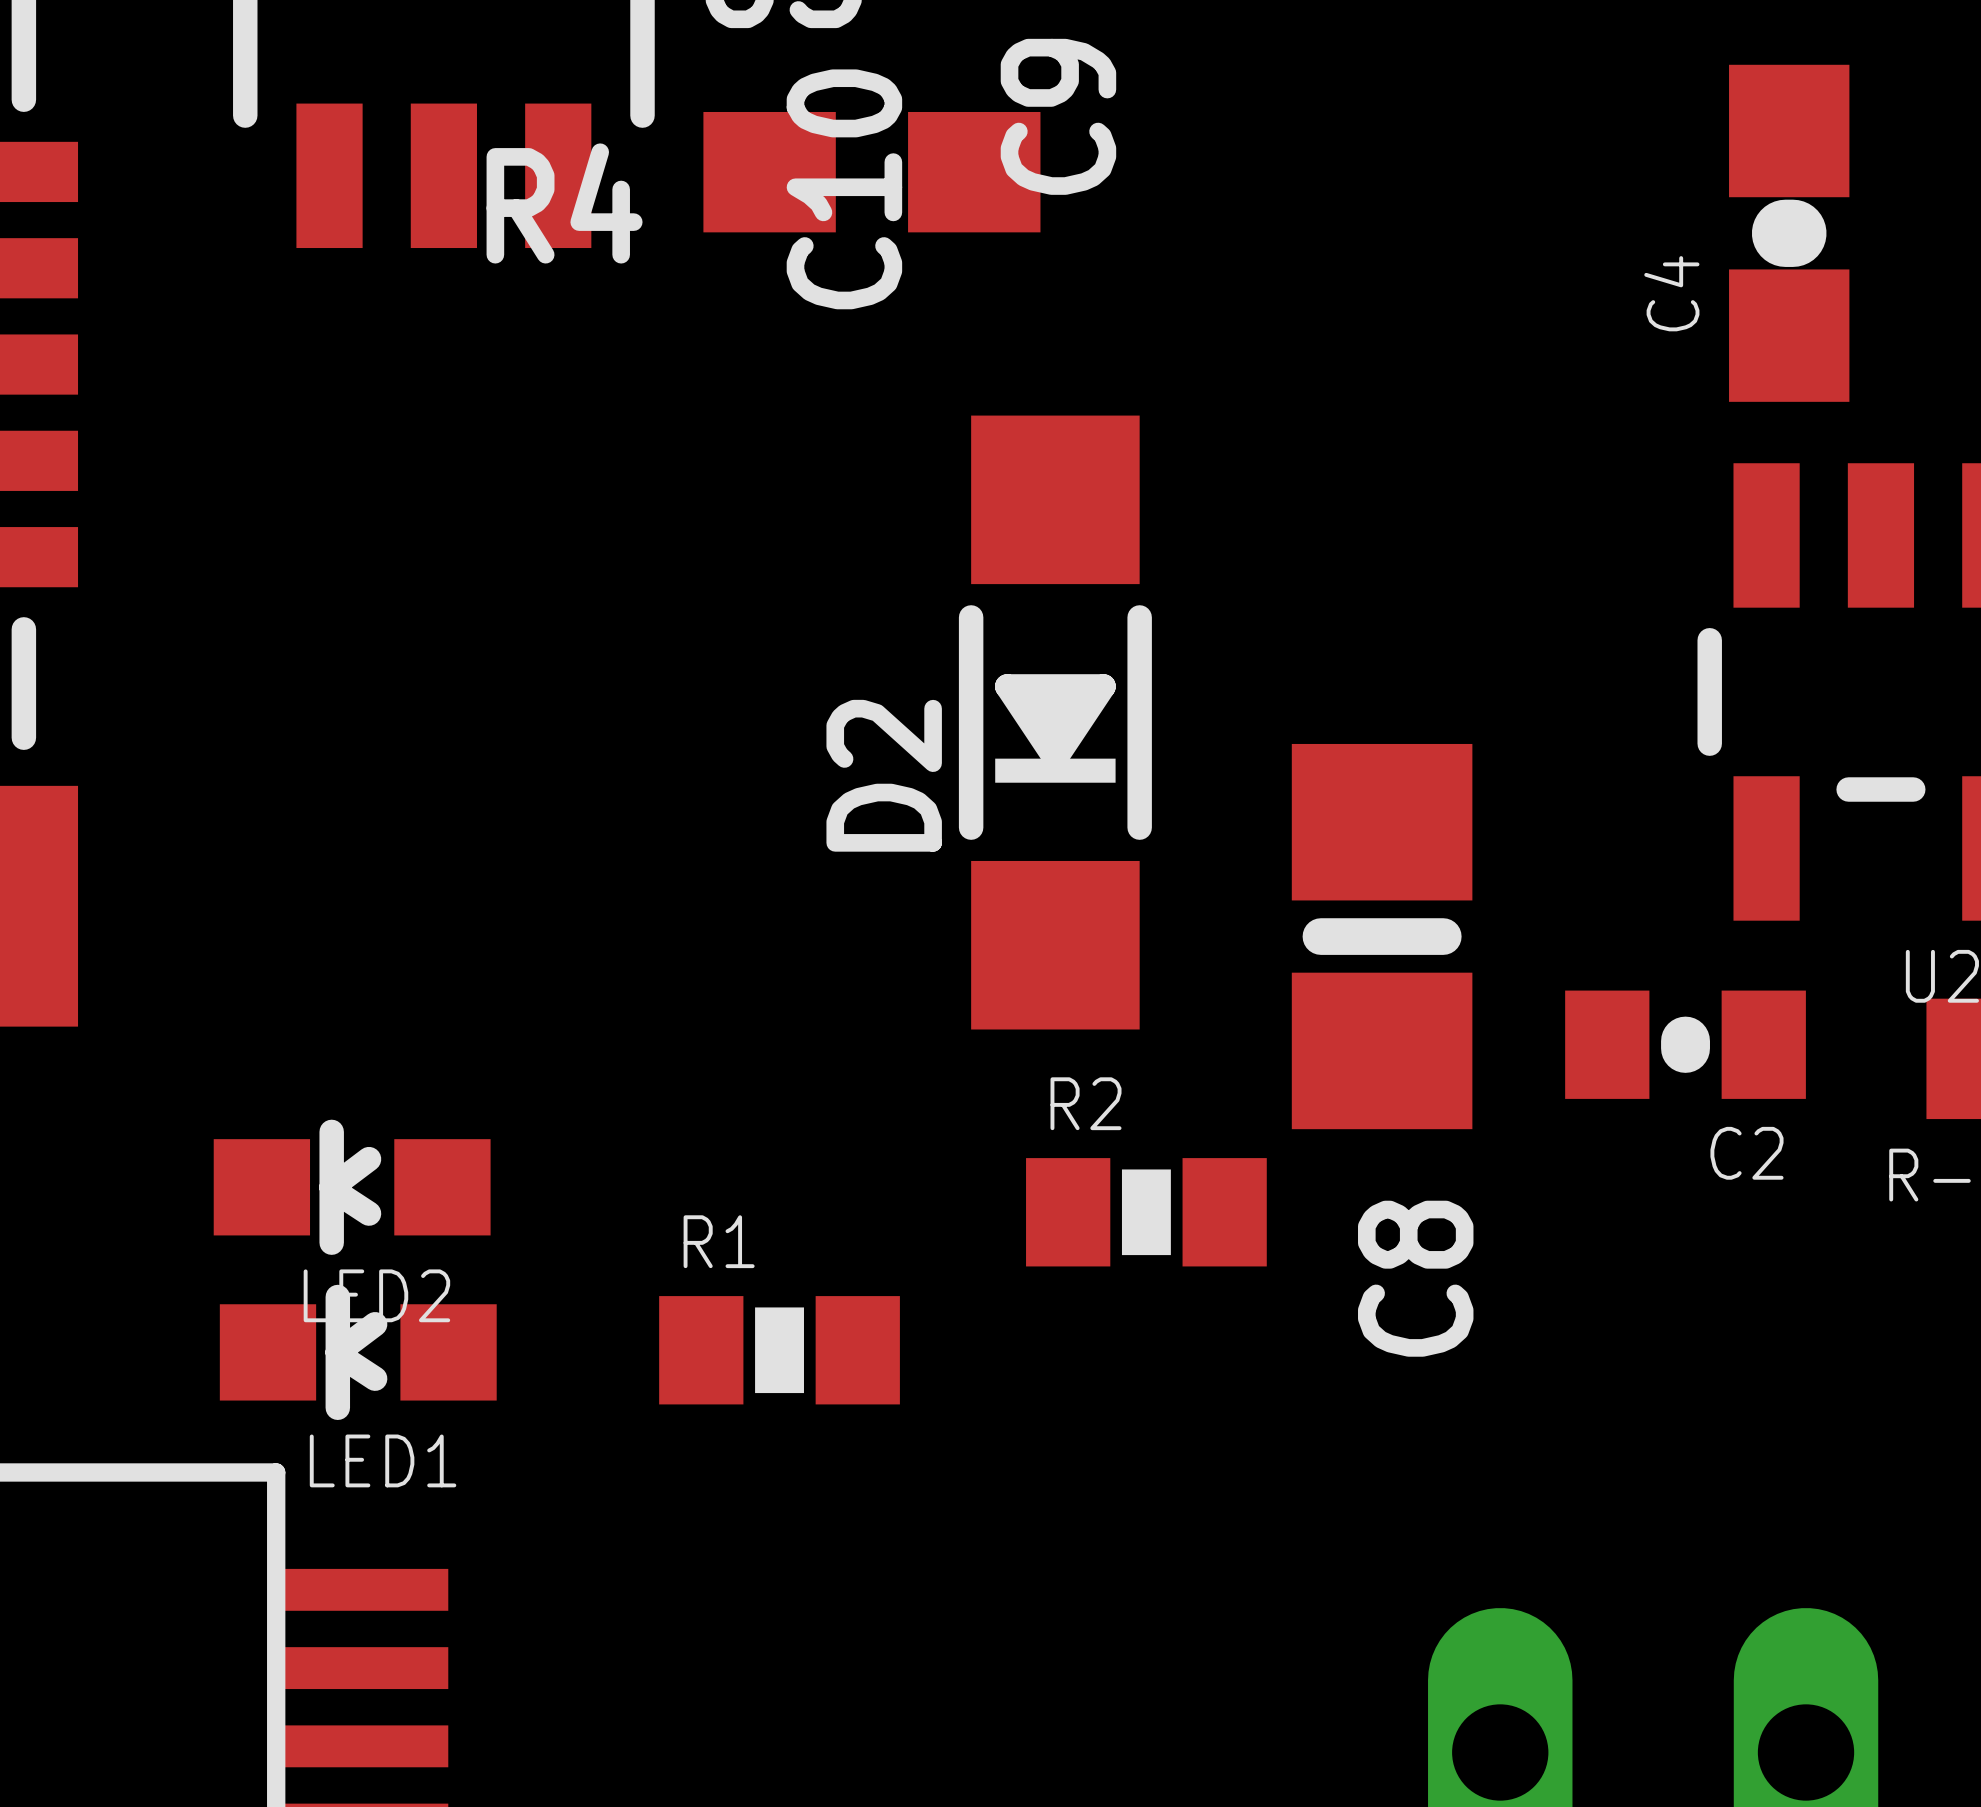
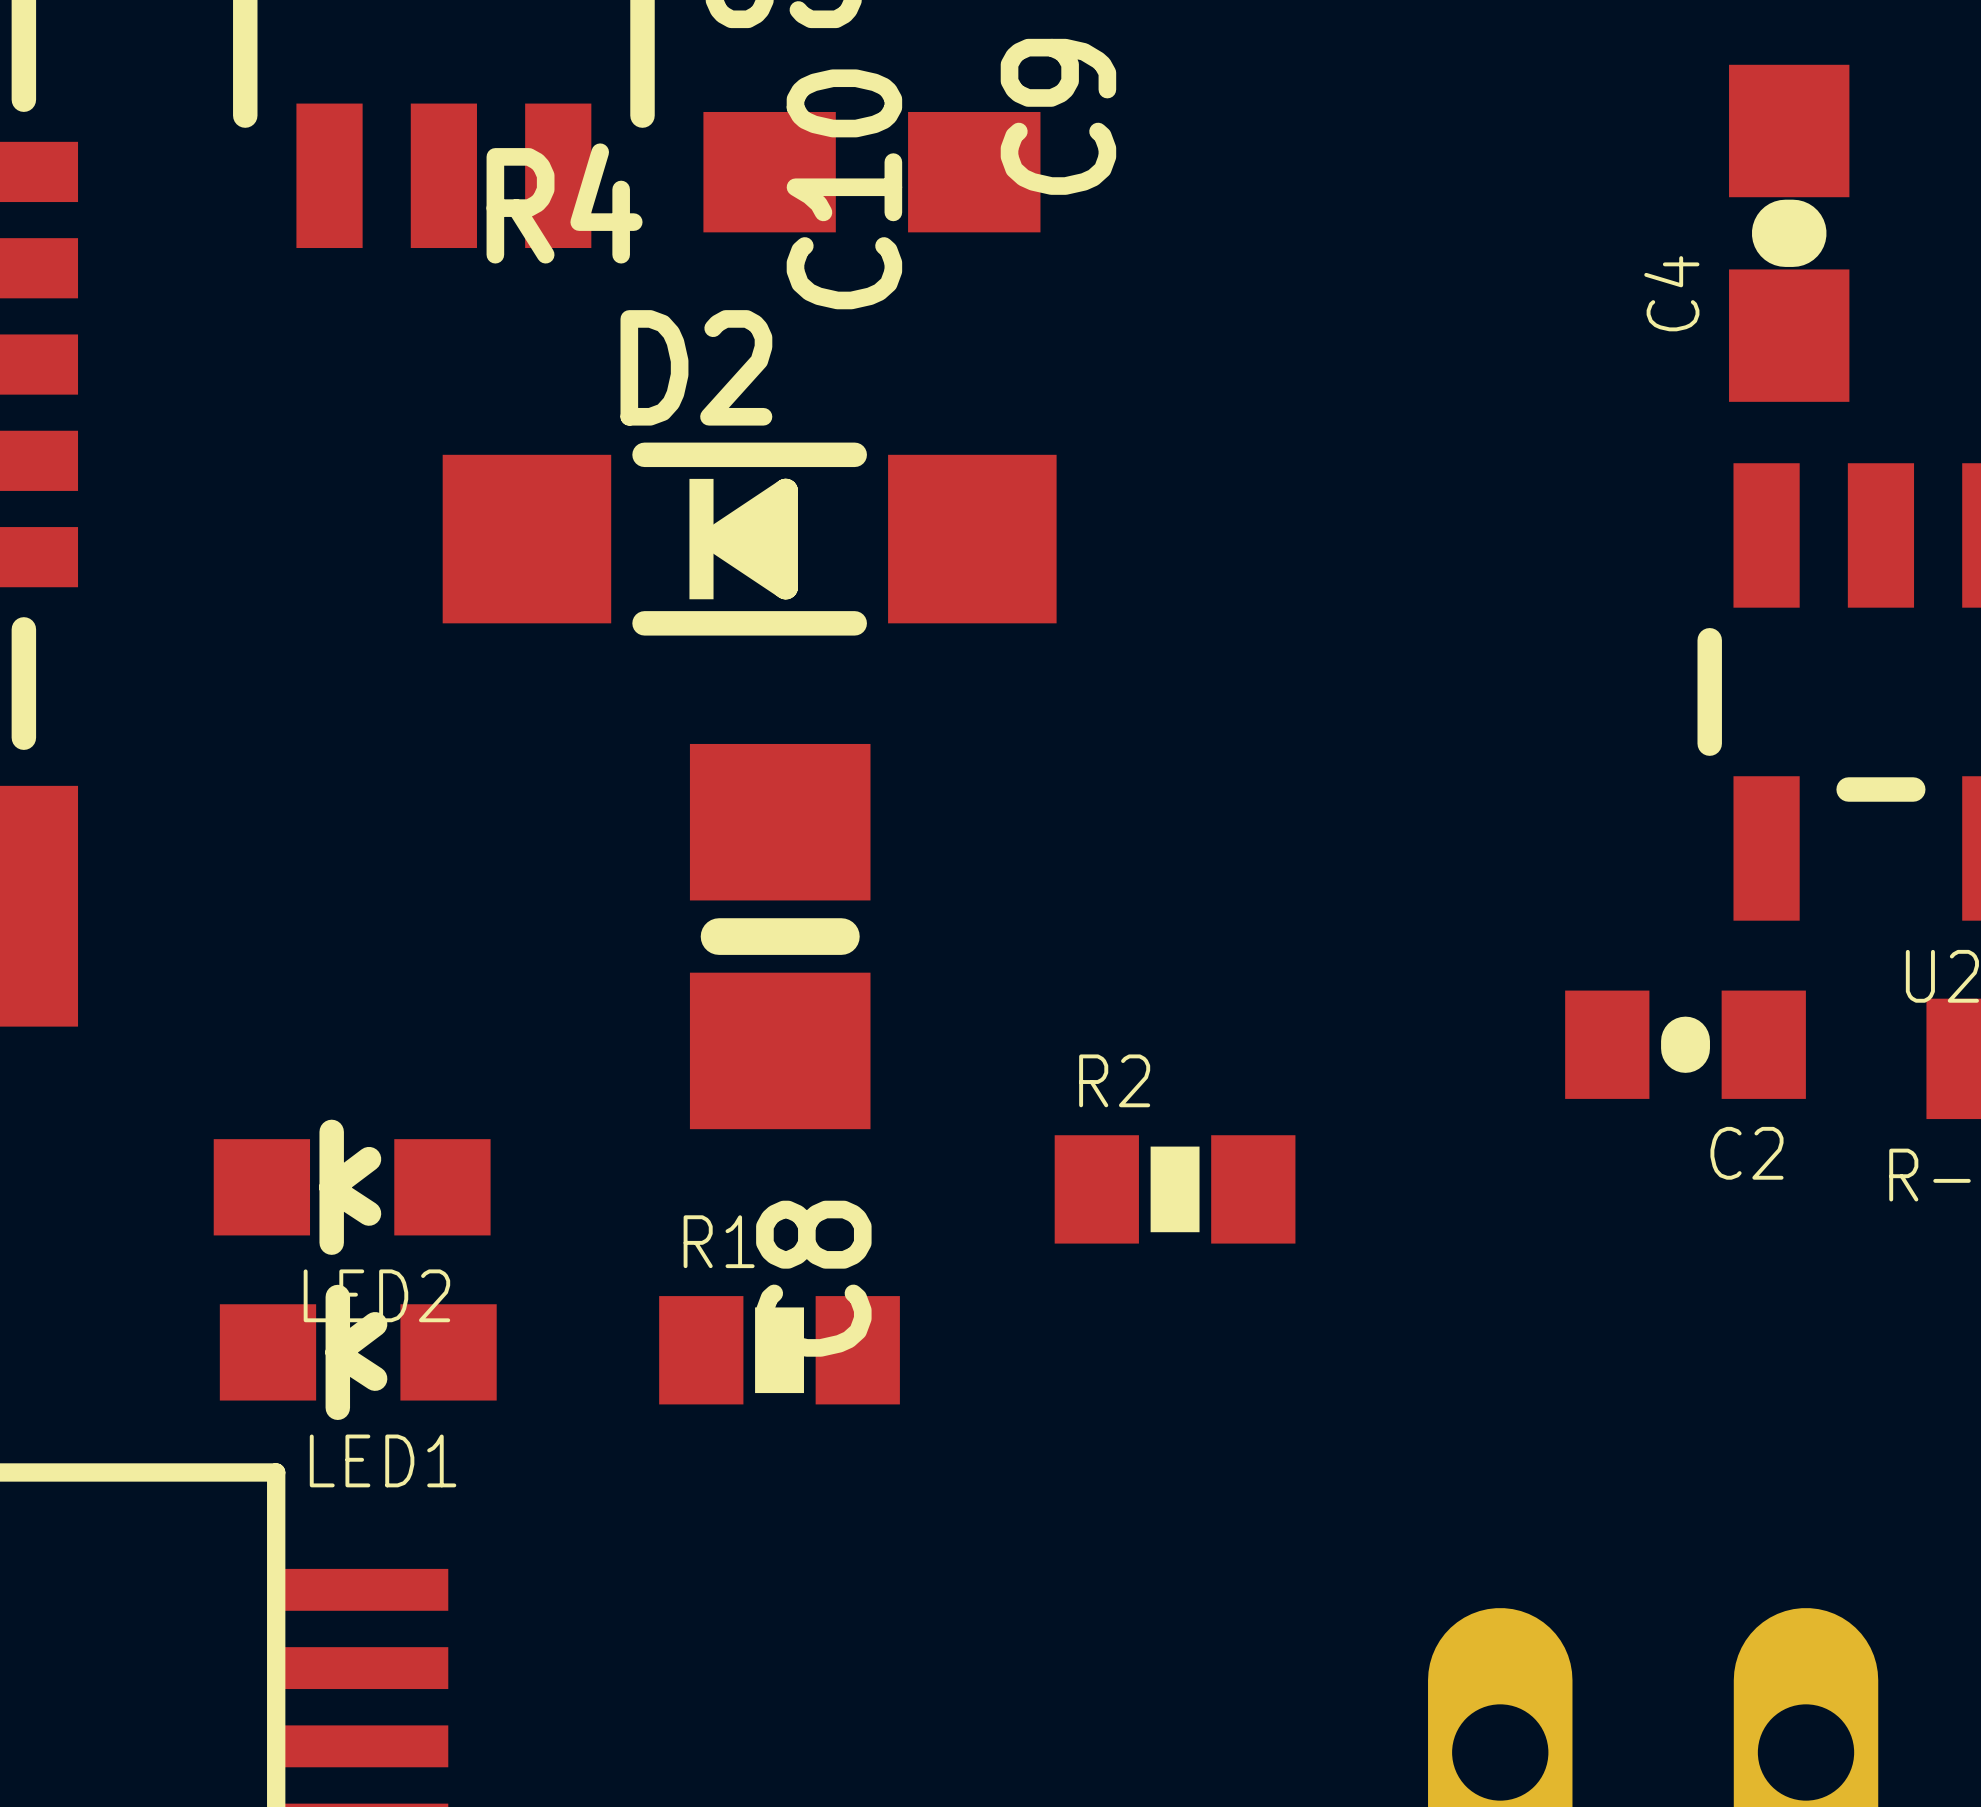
D2 rotation: 0° (1055, 722) -> 90° clockwise (749, 539)
C8 position: (1382, 936) -> (780, 936)
R2 position: (1146, 1212) -> (1175, 1189)

